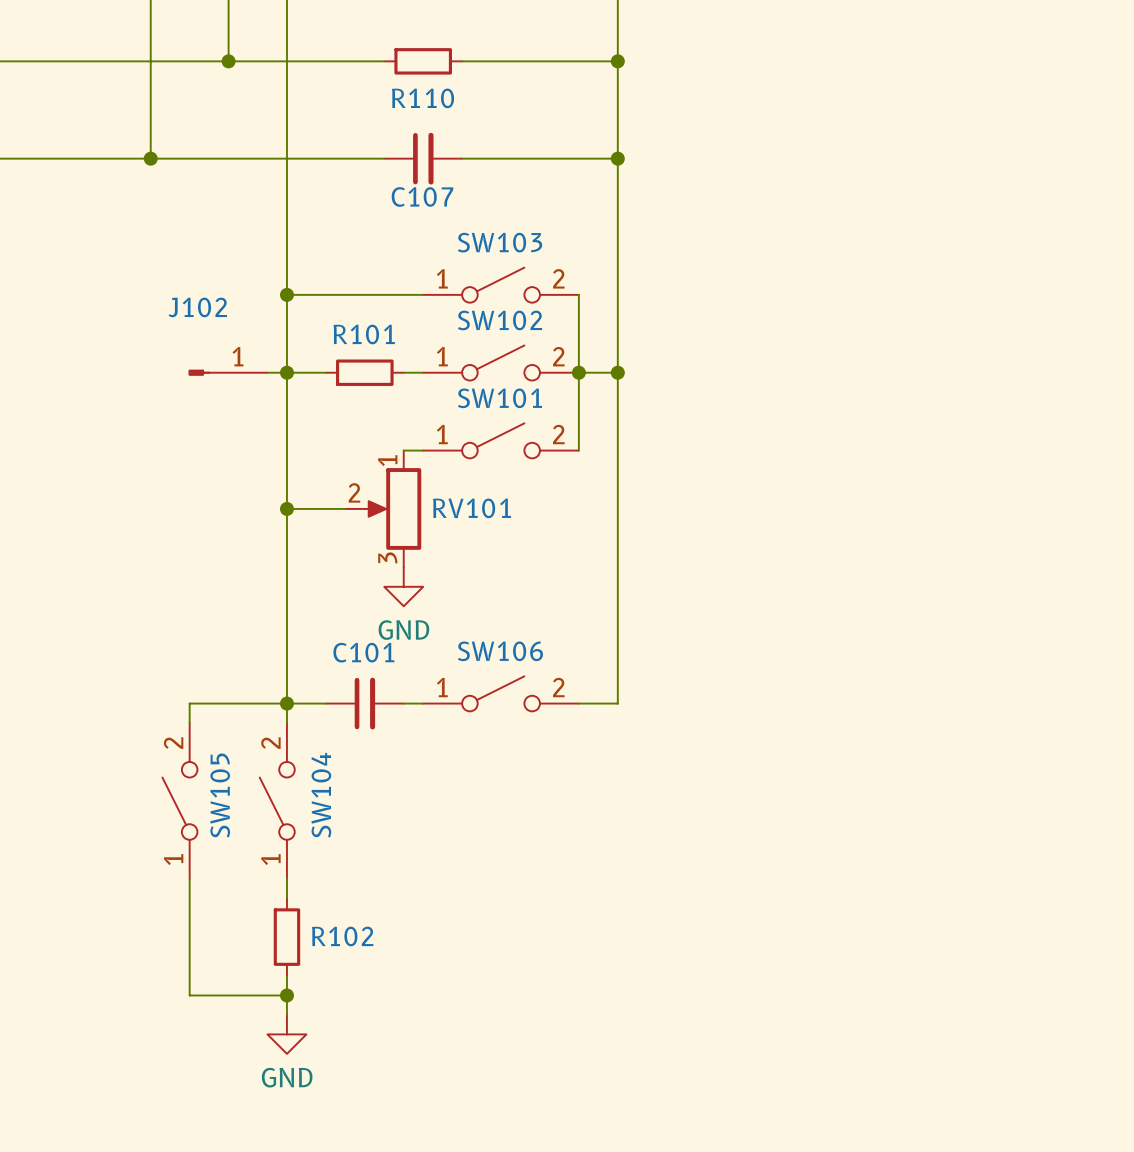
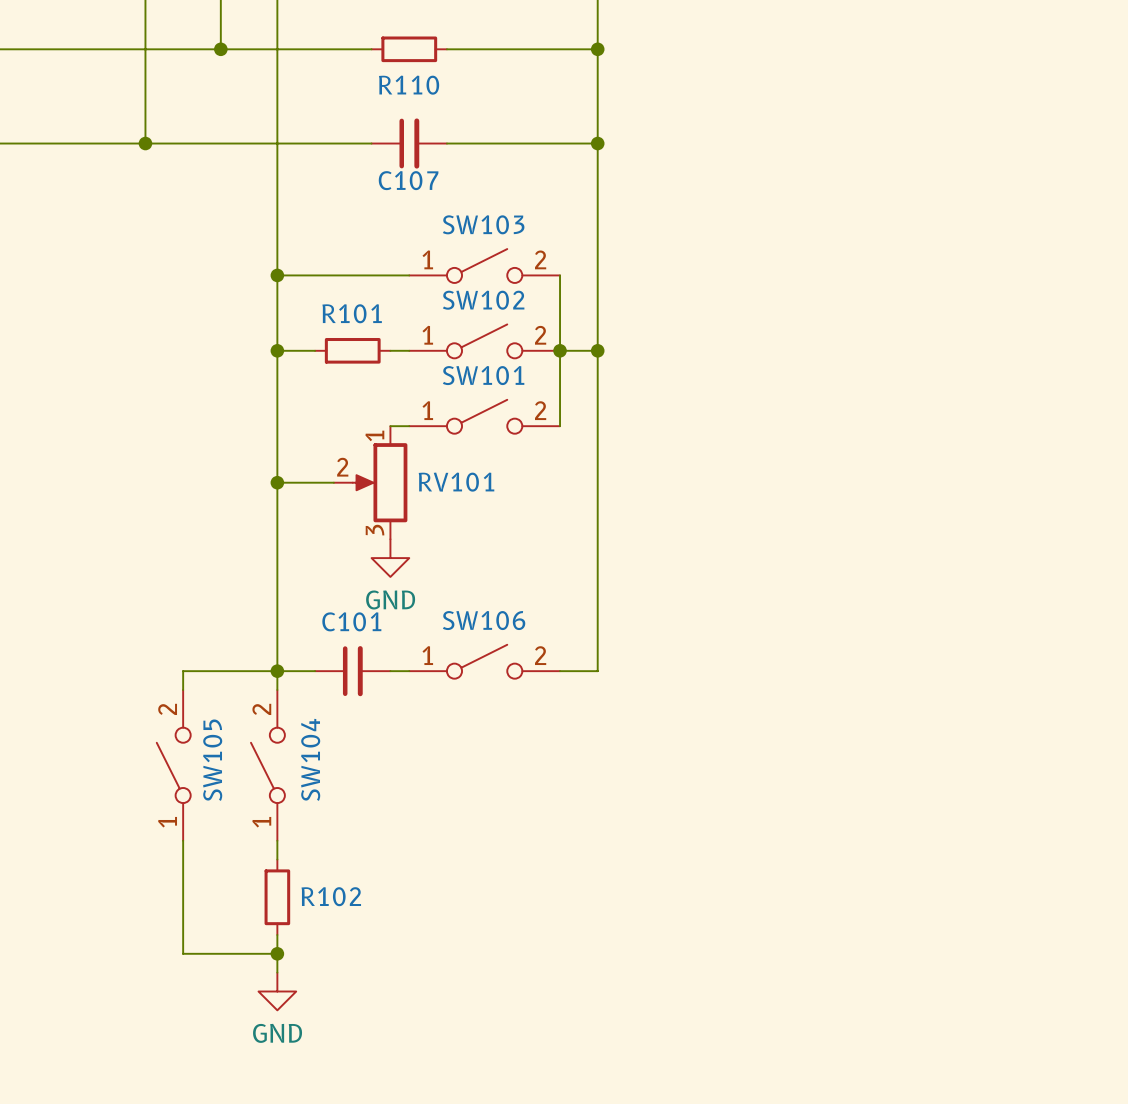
J102: (228, 372) -> none
wire: (267, 372) (286, 372) -> none

